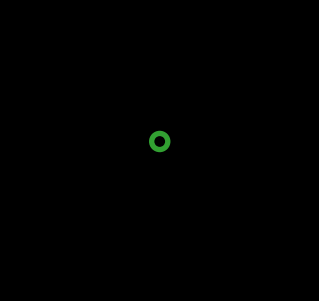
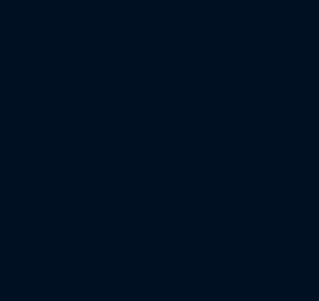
via: (159, 141) -> none

